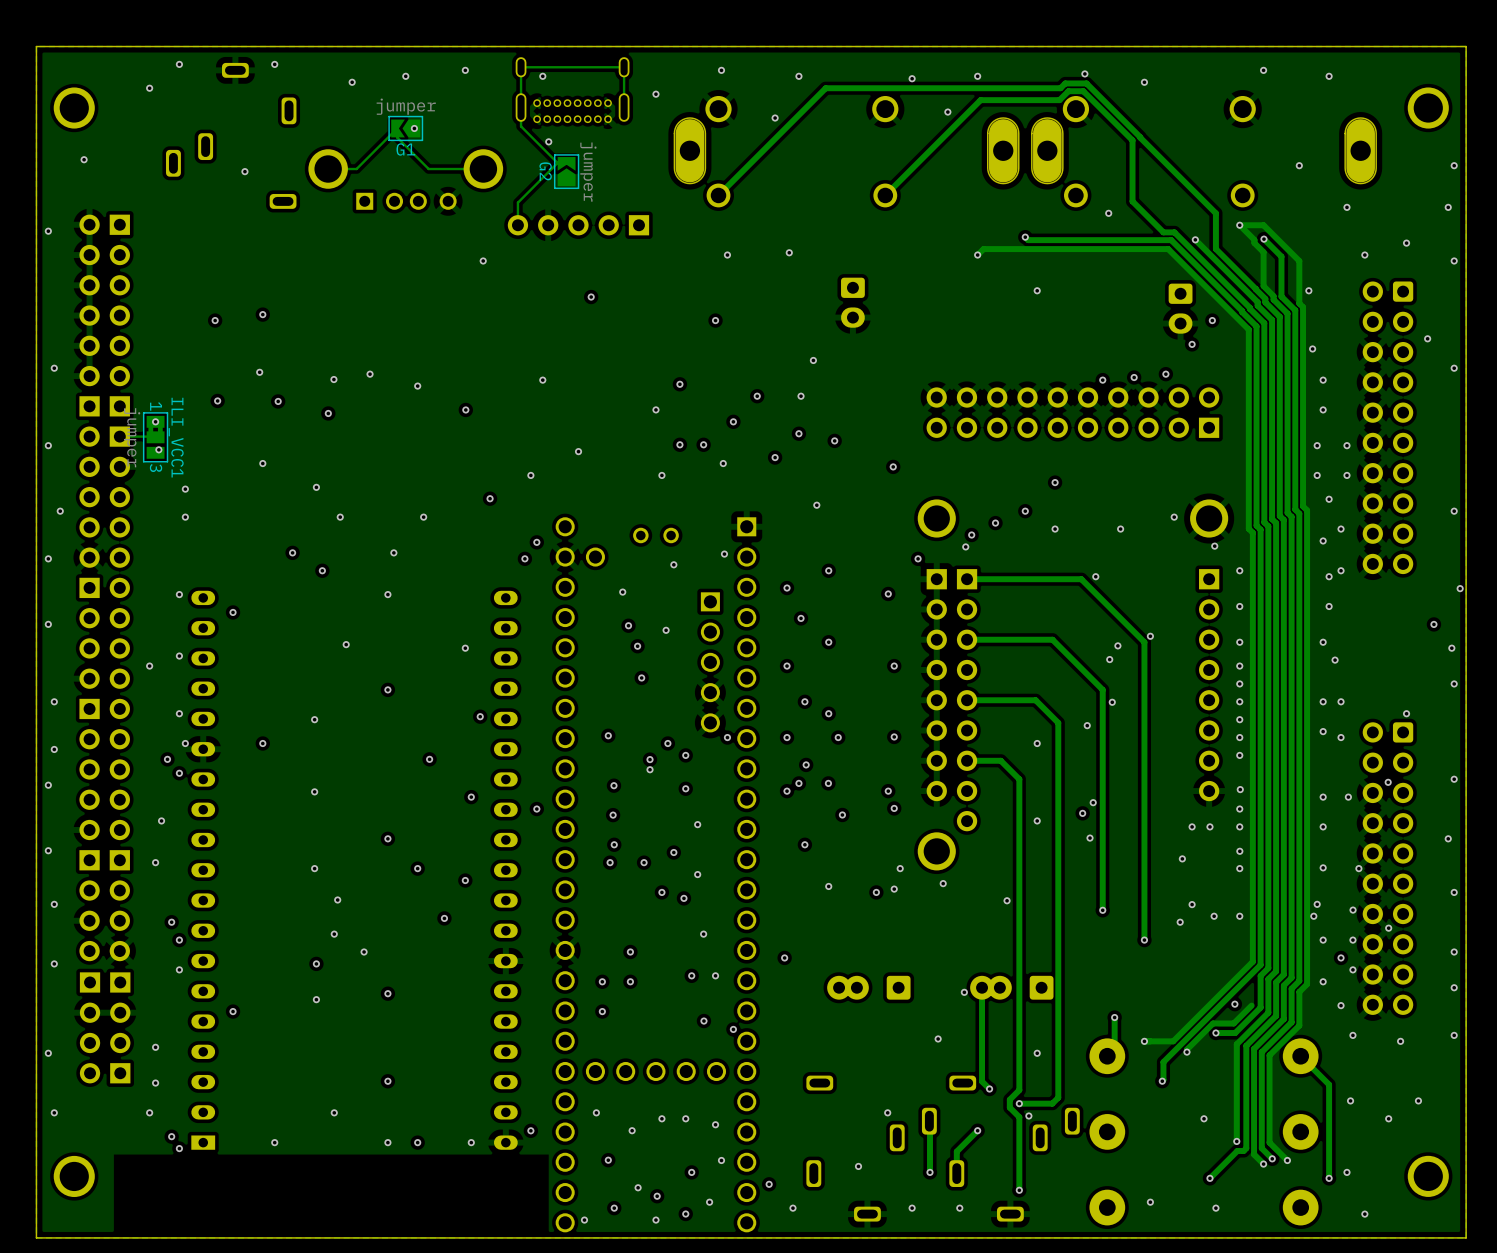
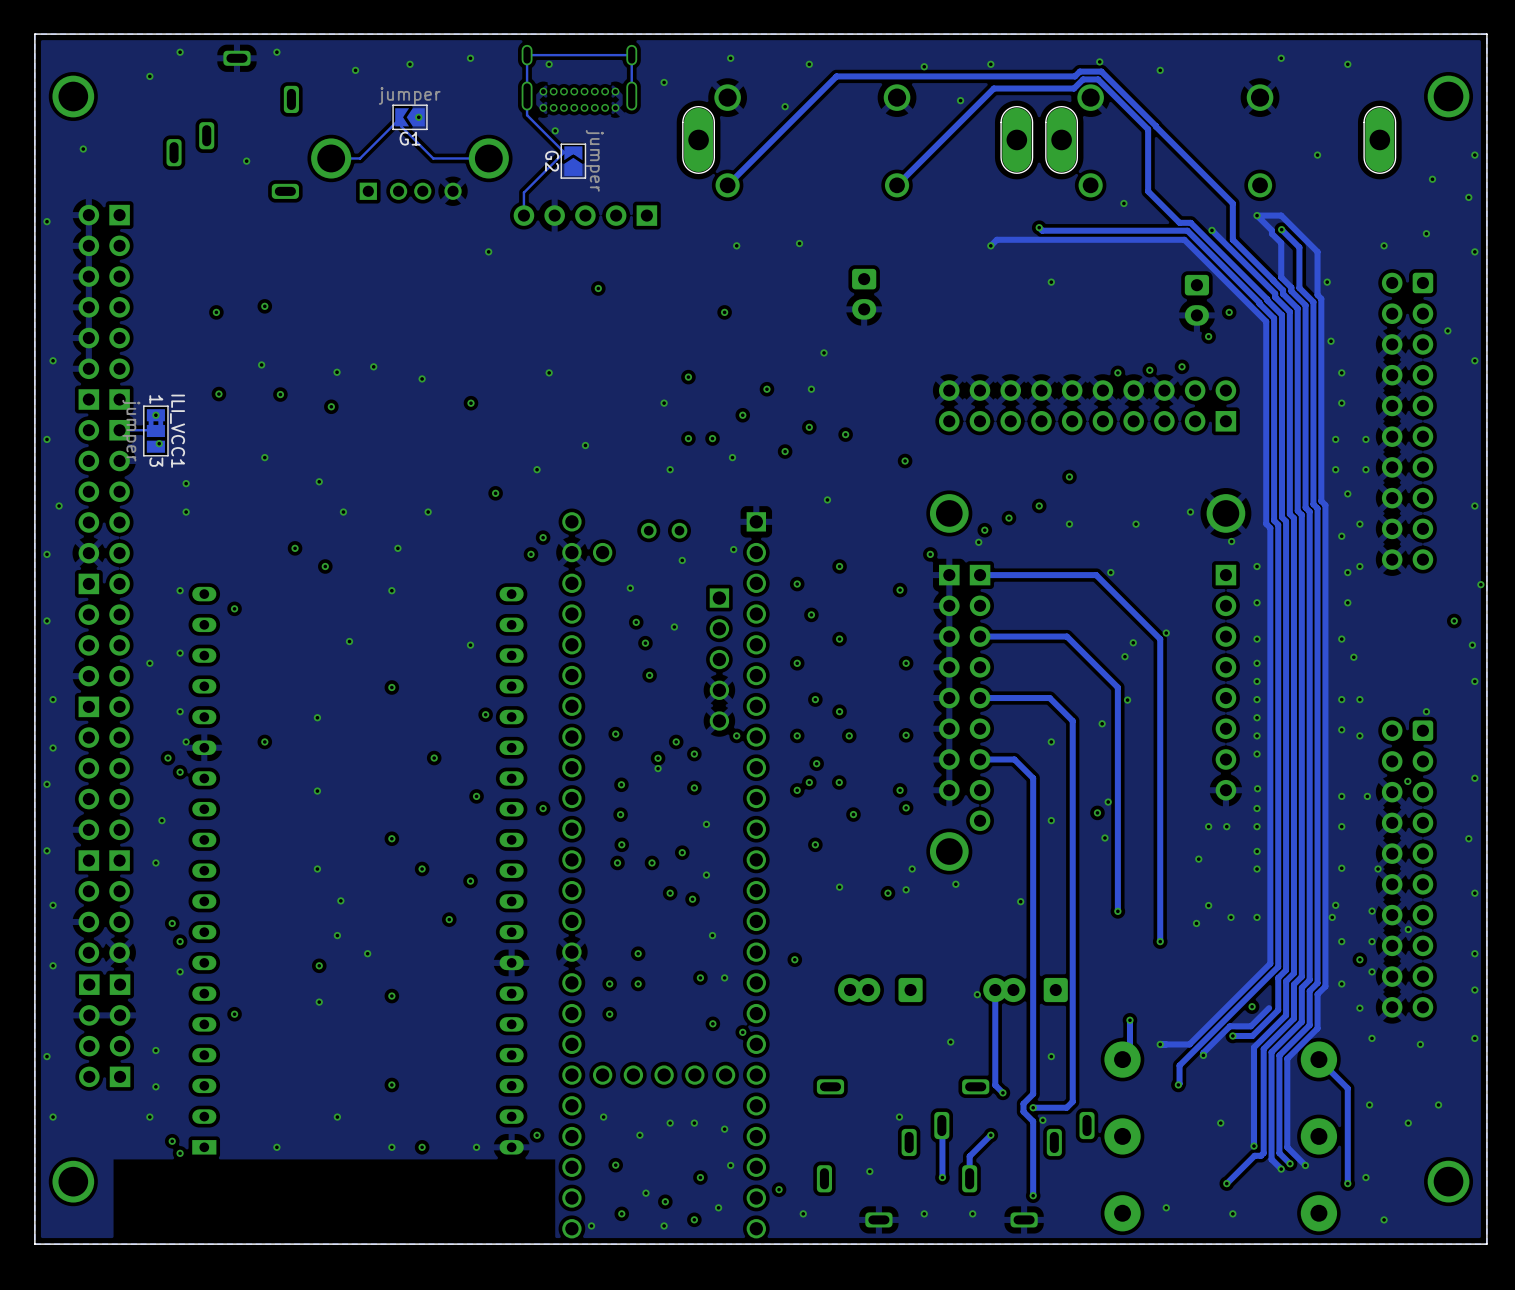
via position: (1346, 207) -> (1432, 179)

